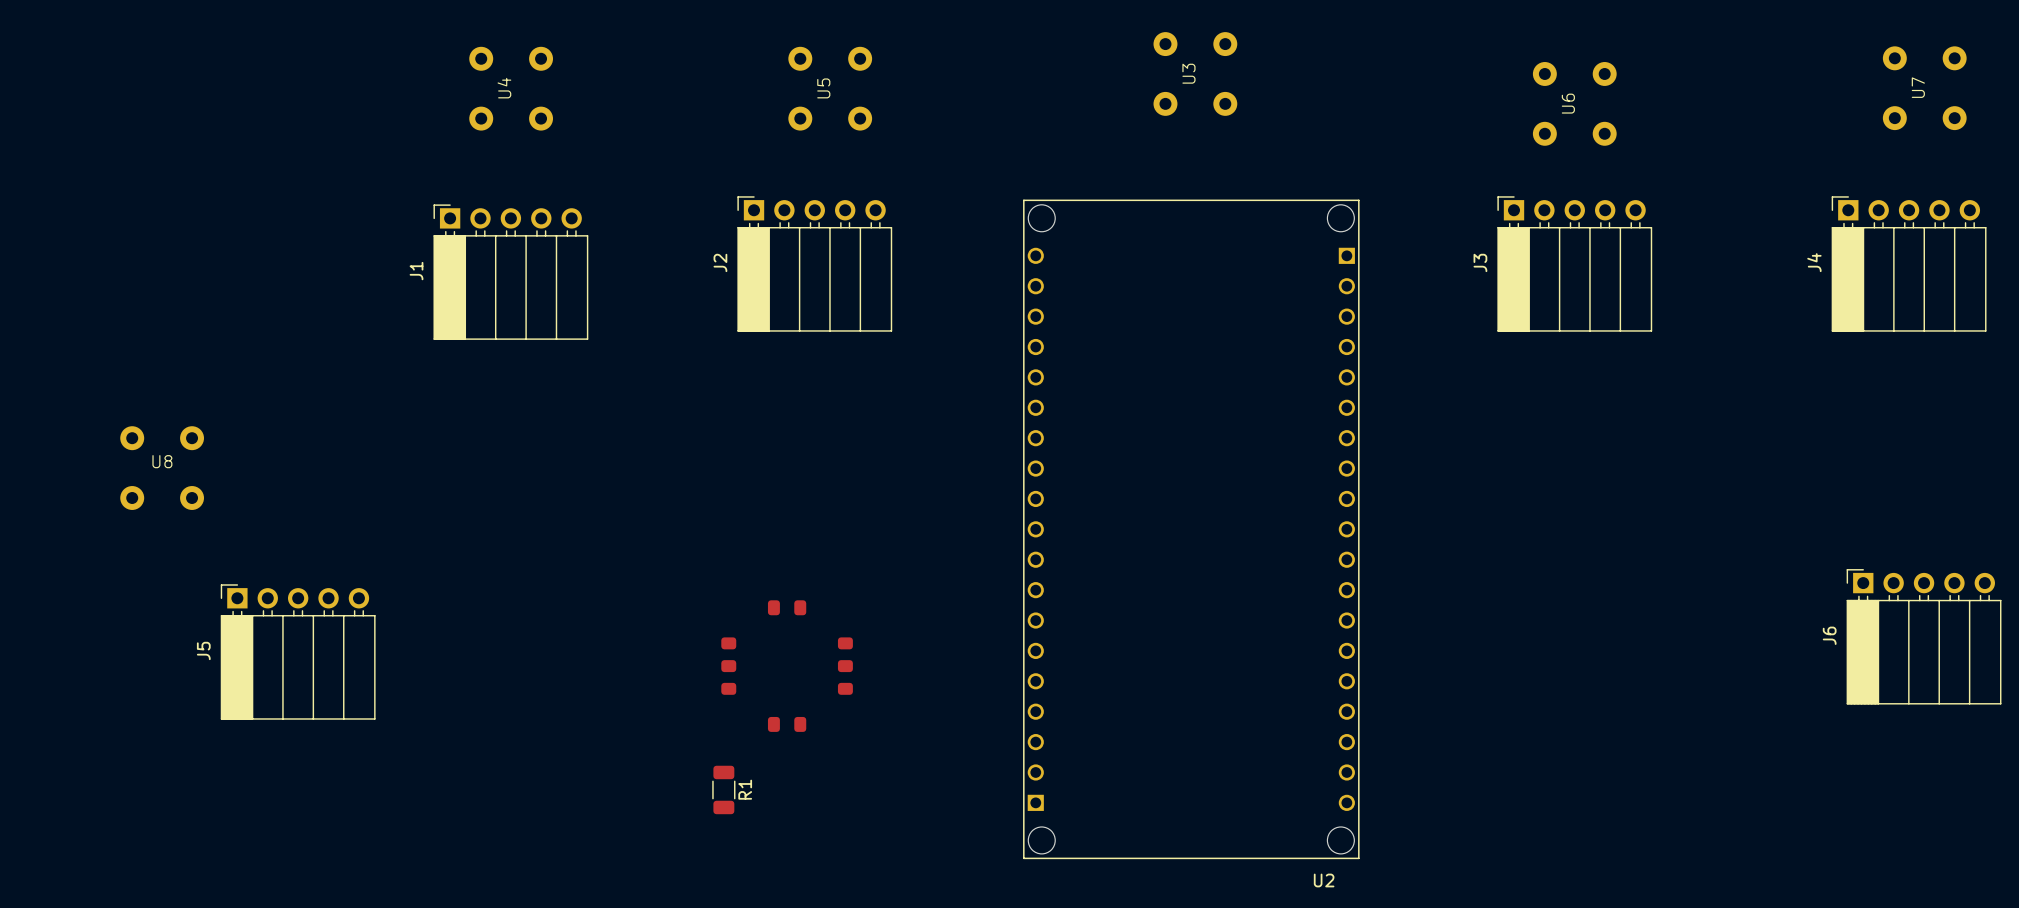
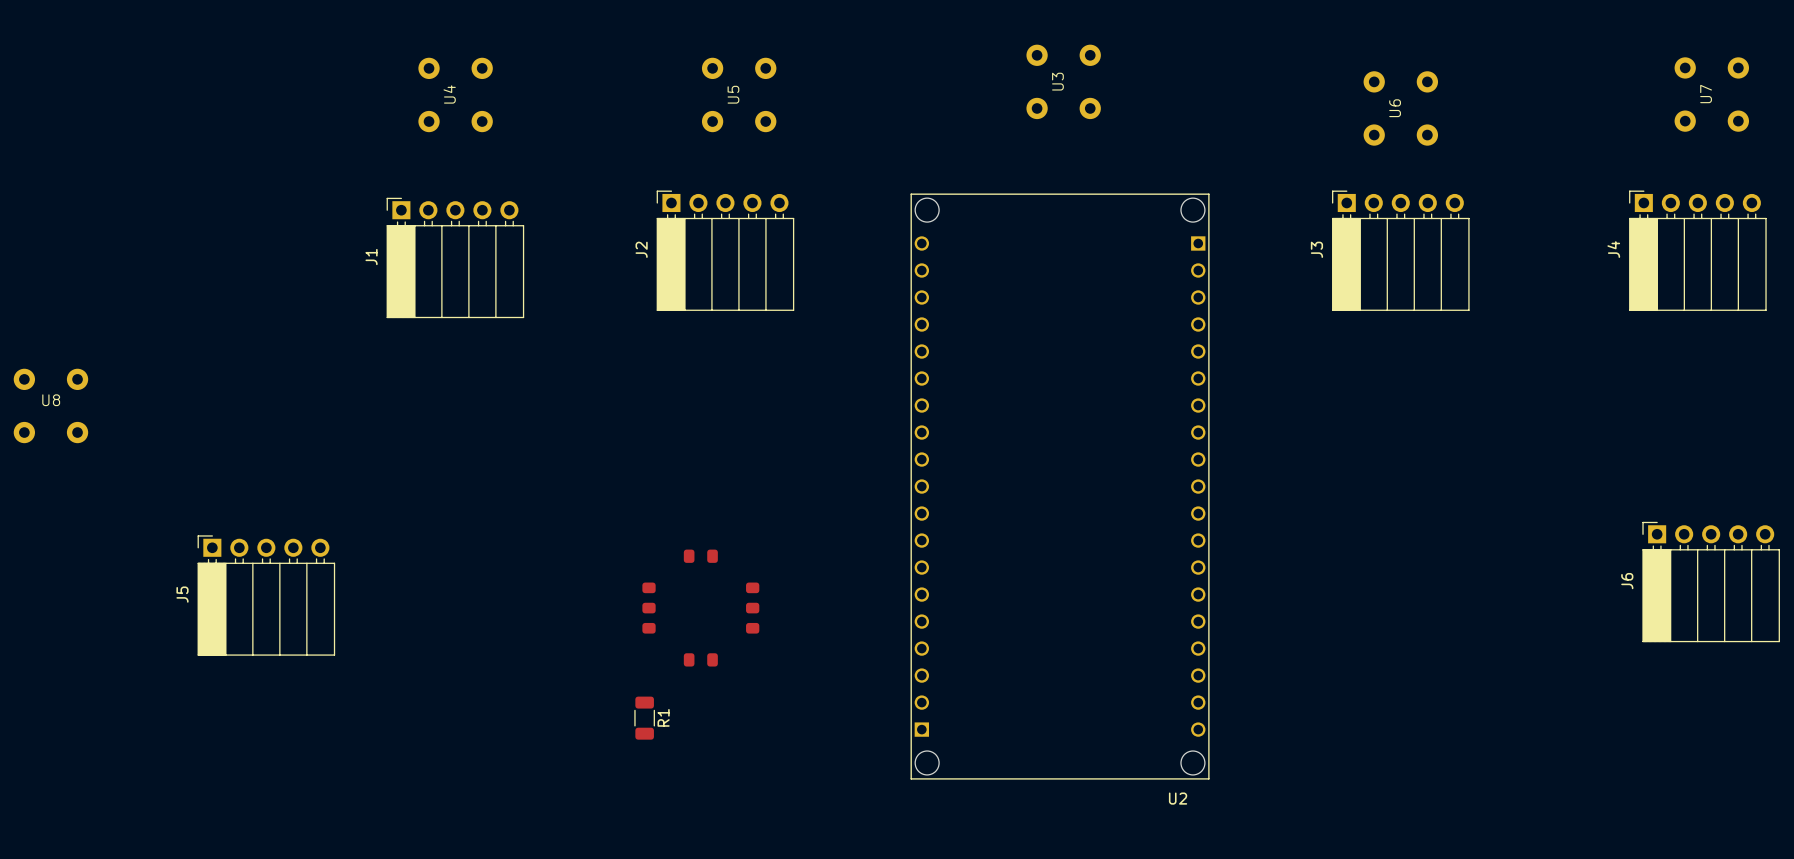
U8 position: (162, 468) -> (50, 405)

